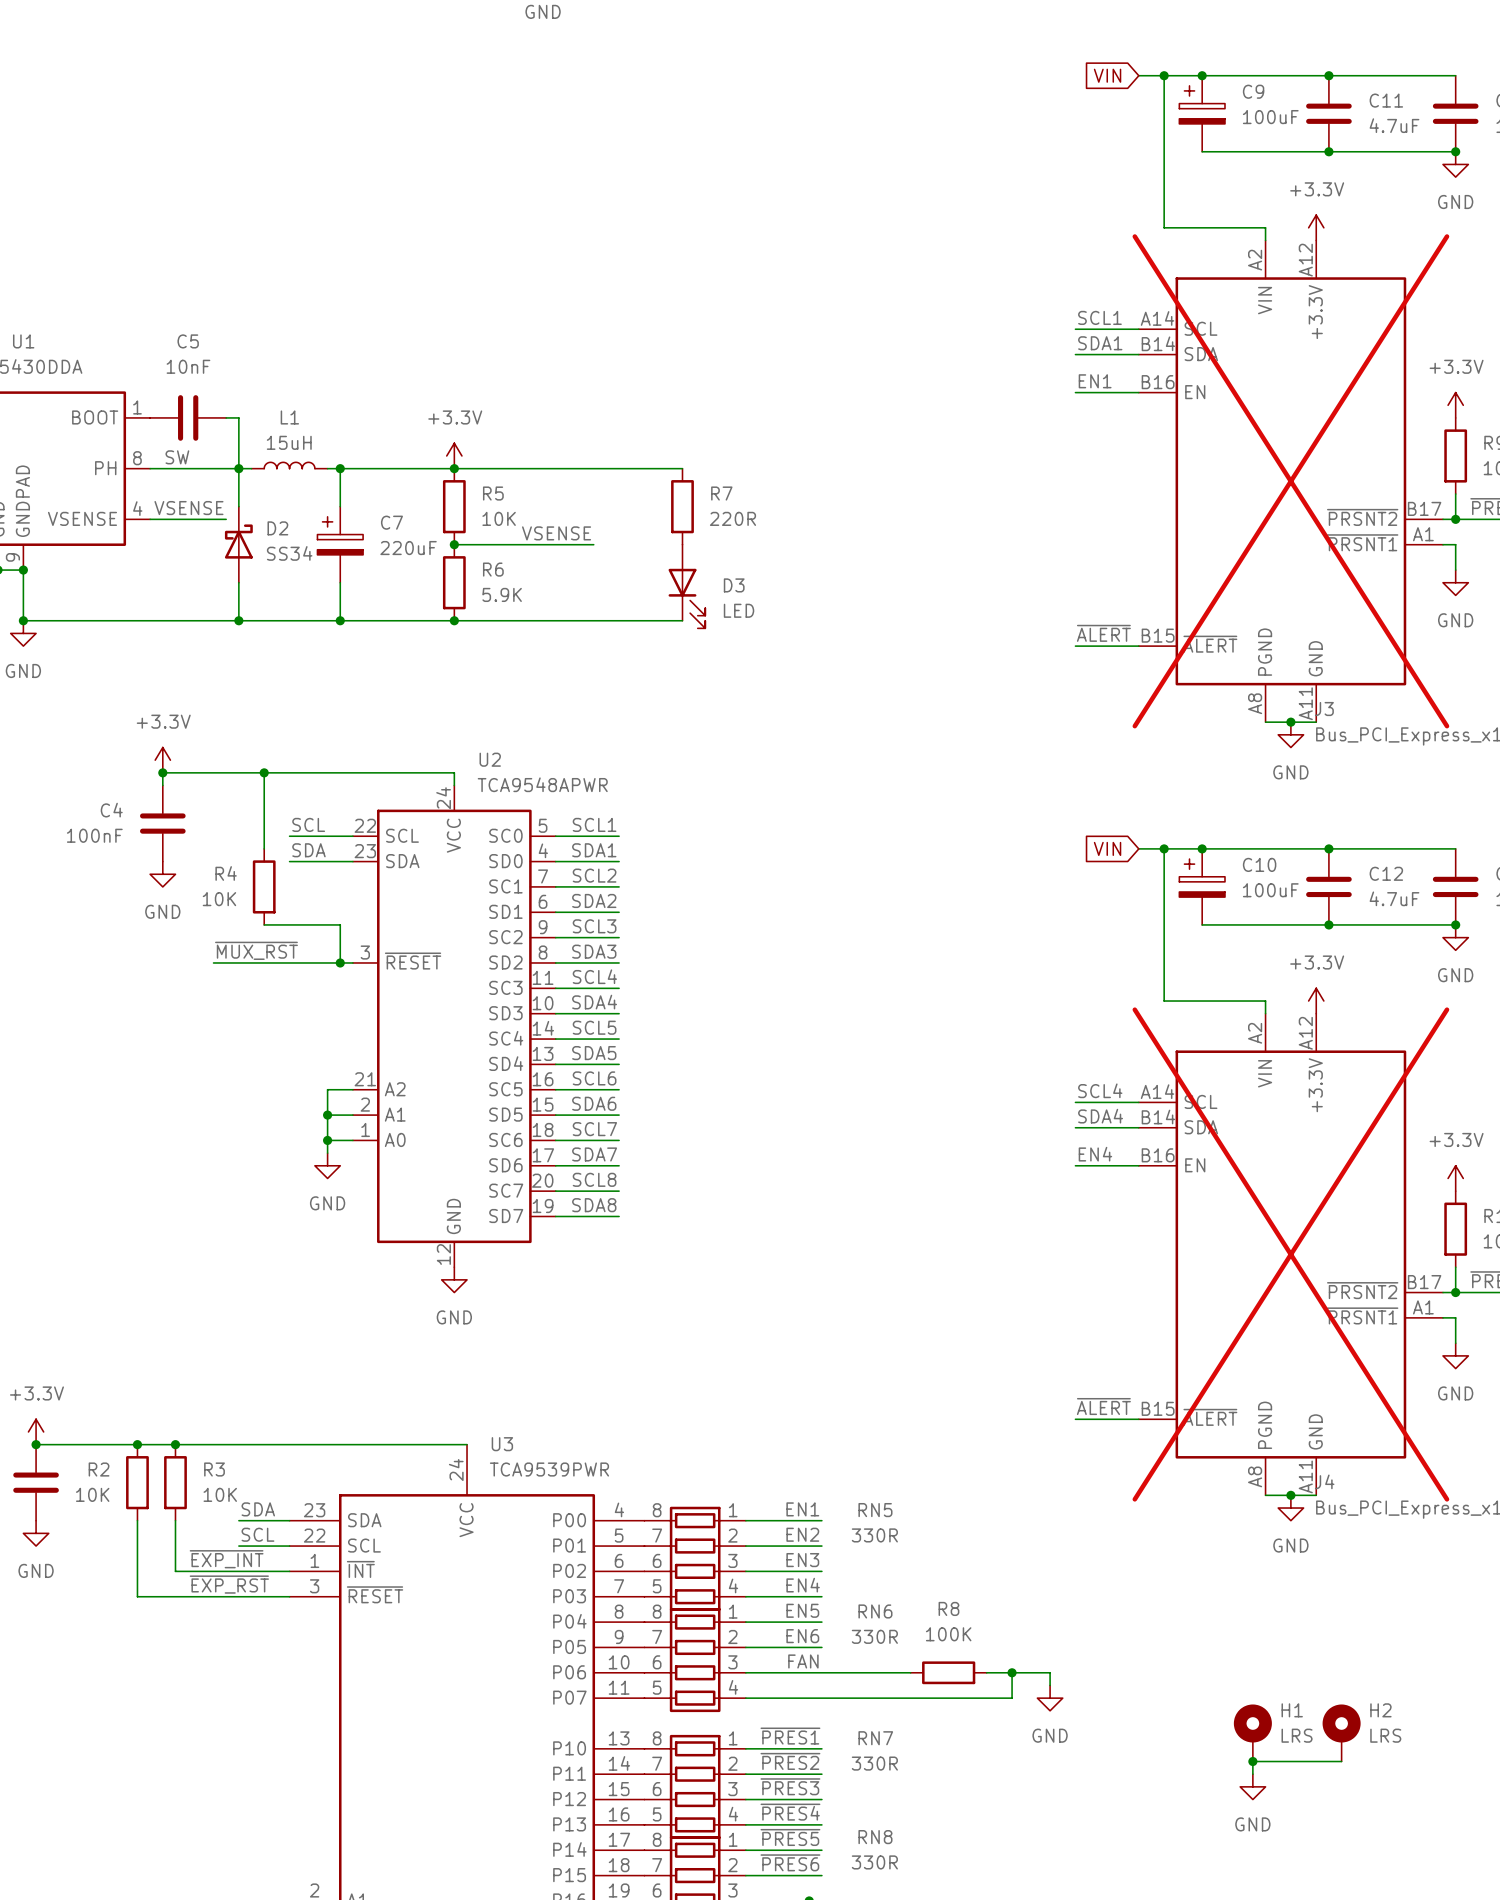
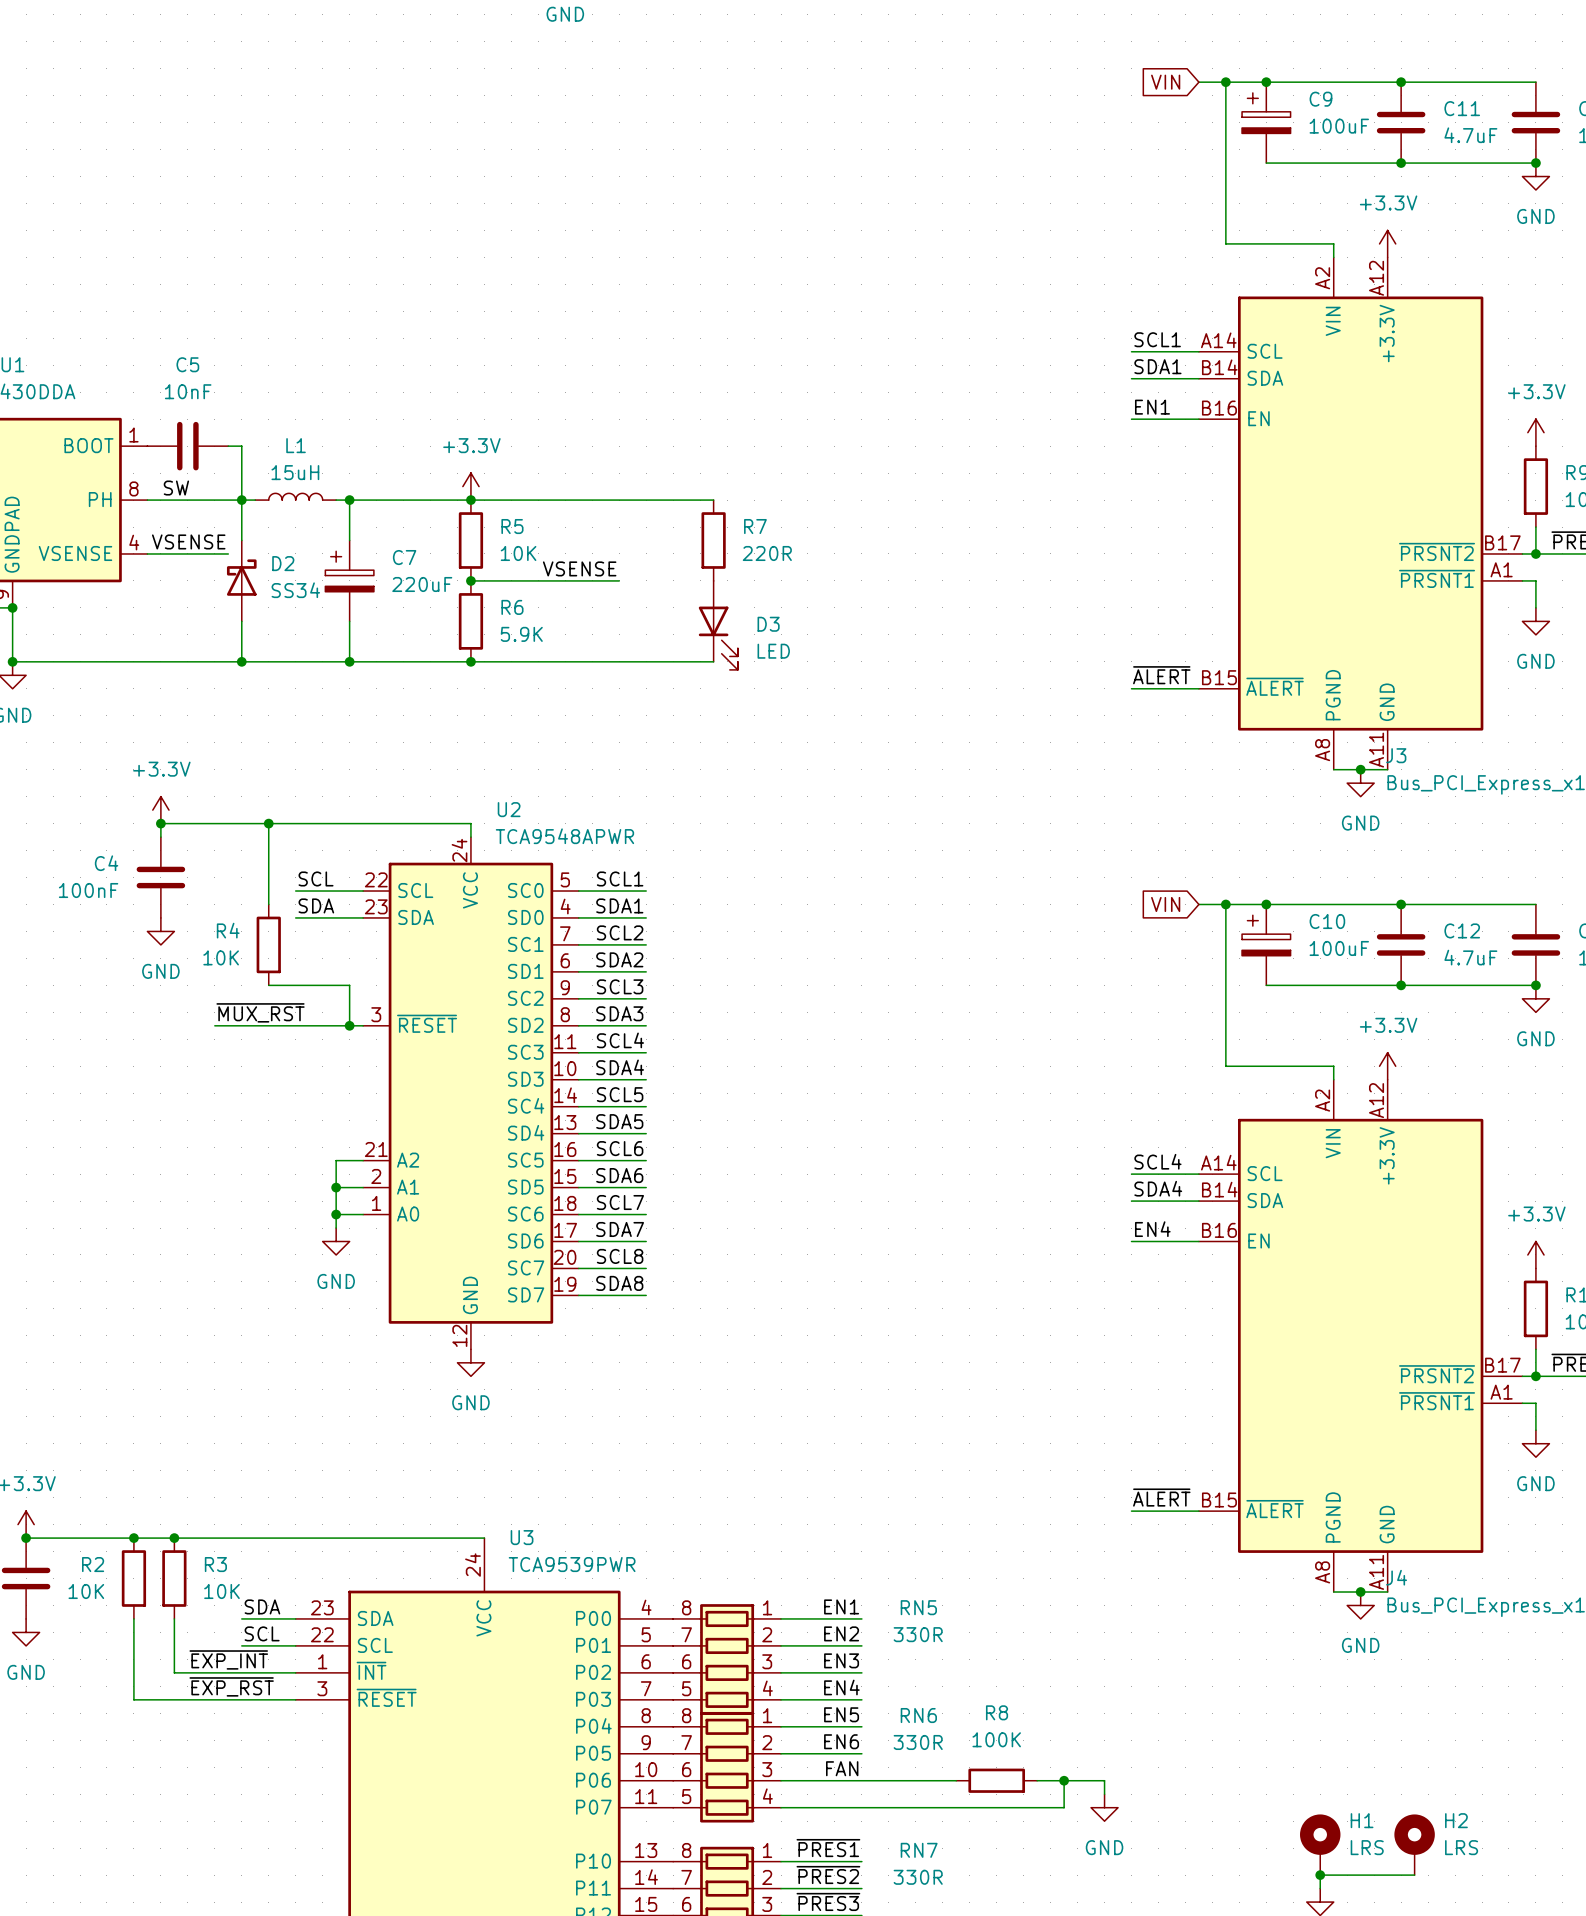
J3 do-not-place cross: (1290, 481) -> none
J4 do-not-place cross: (1290, 1254) -> none

